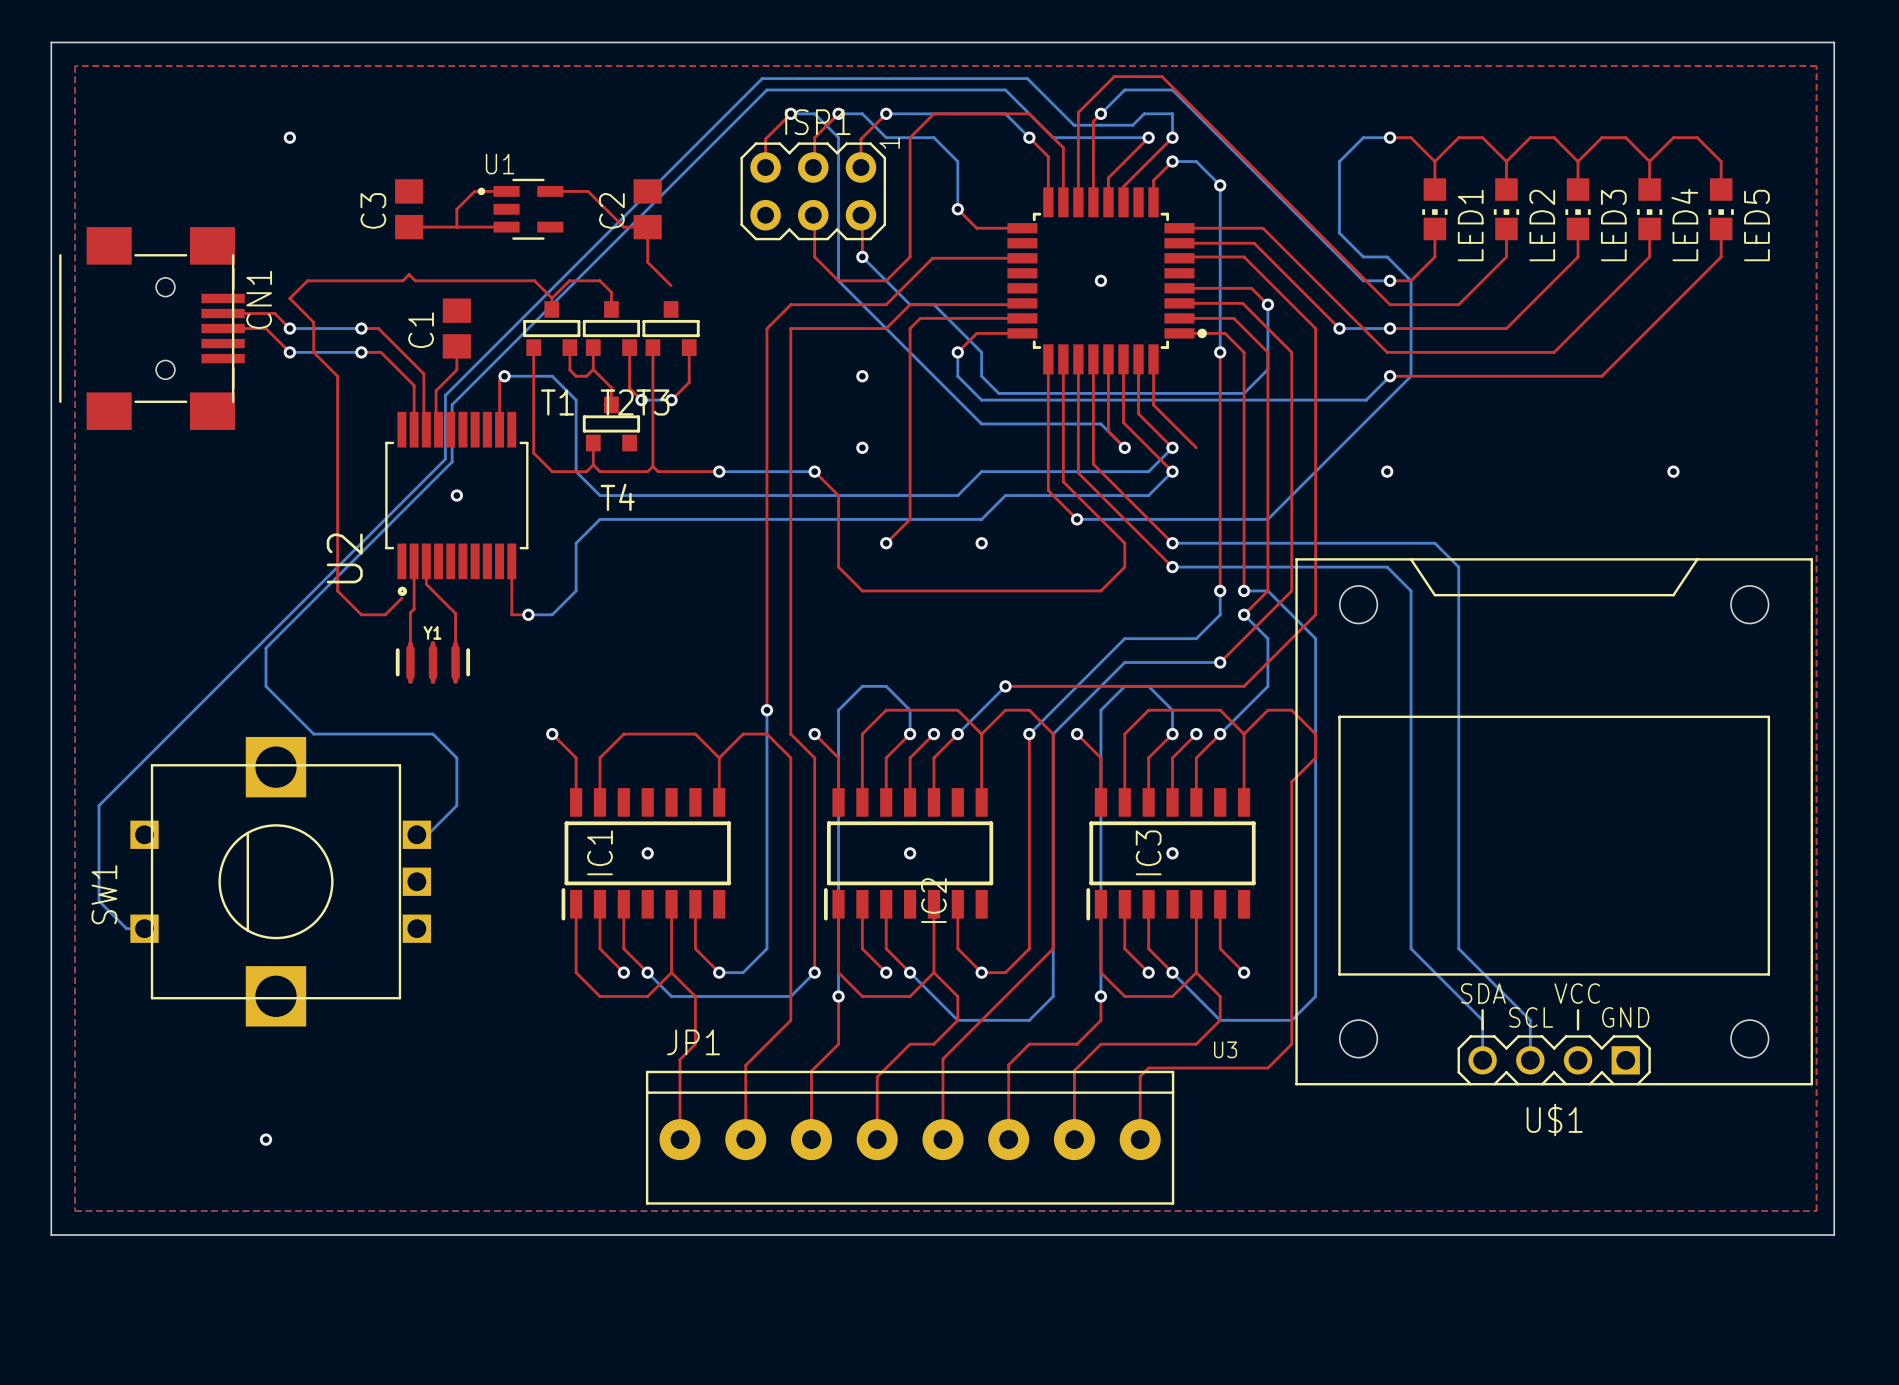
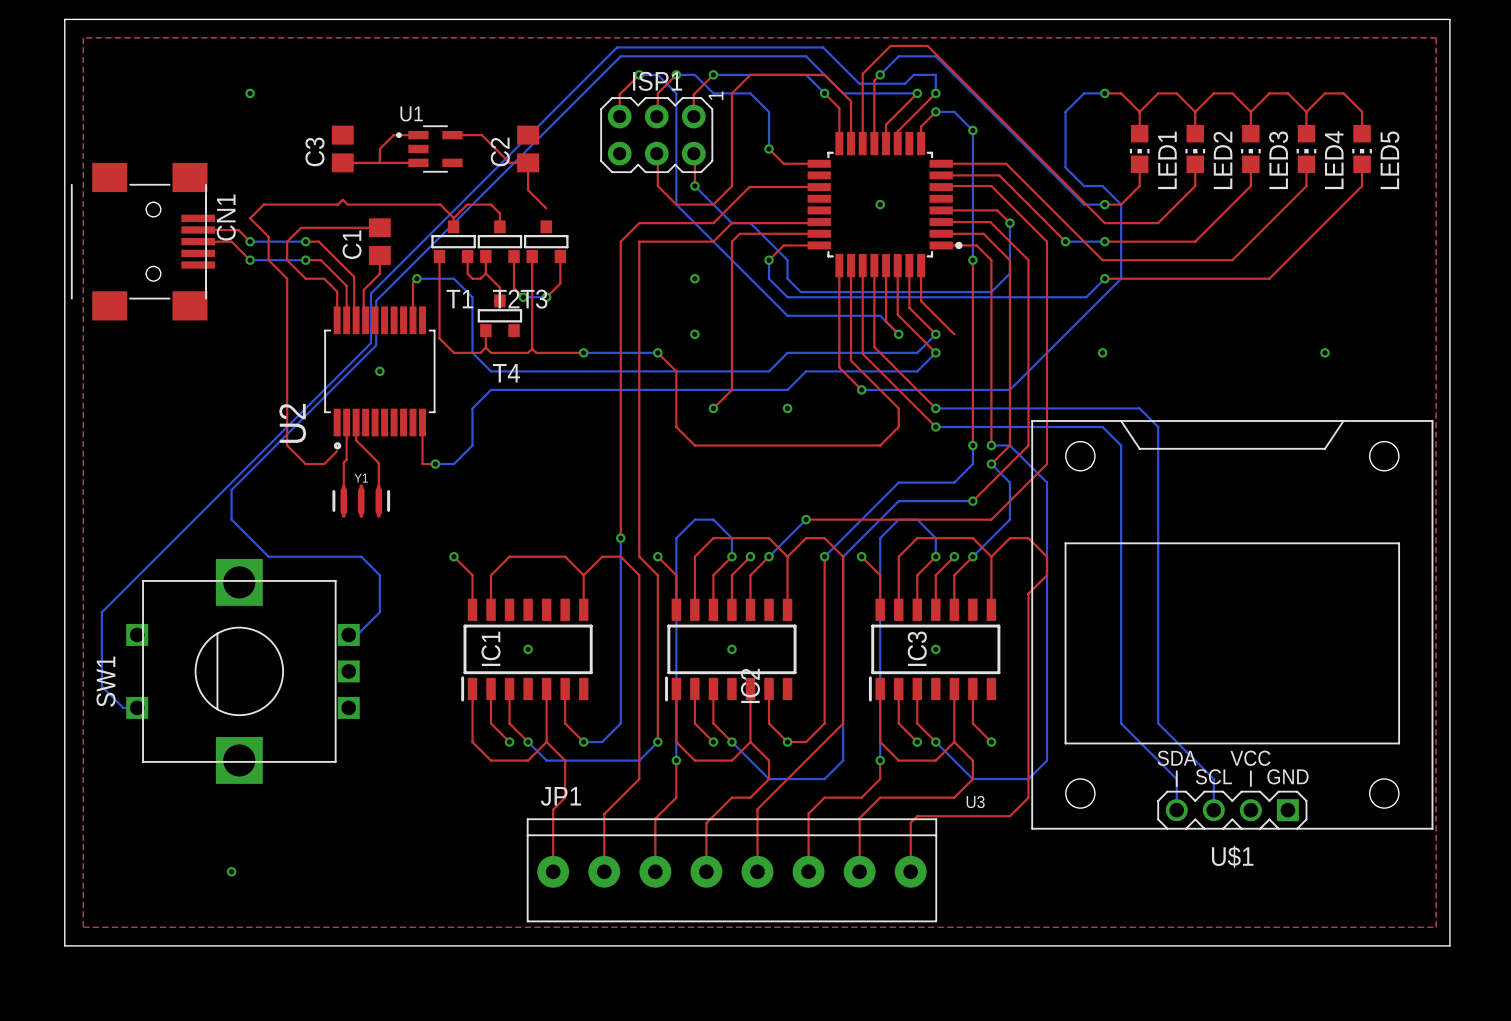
top track: none -> (379, 227) (301, 227) (287, 241) (287, 260) (305, 278) (324, 278) (337, 291) (337, 320)

